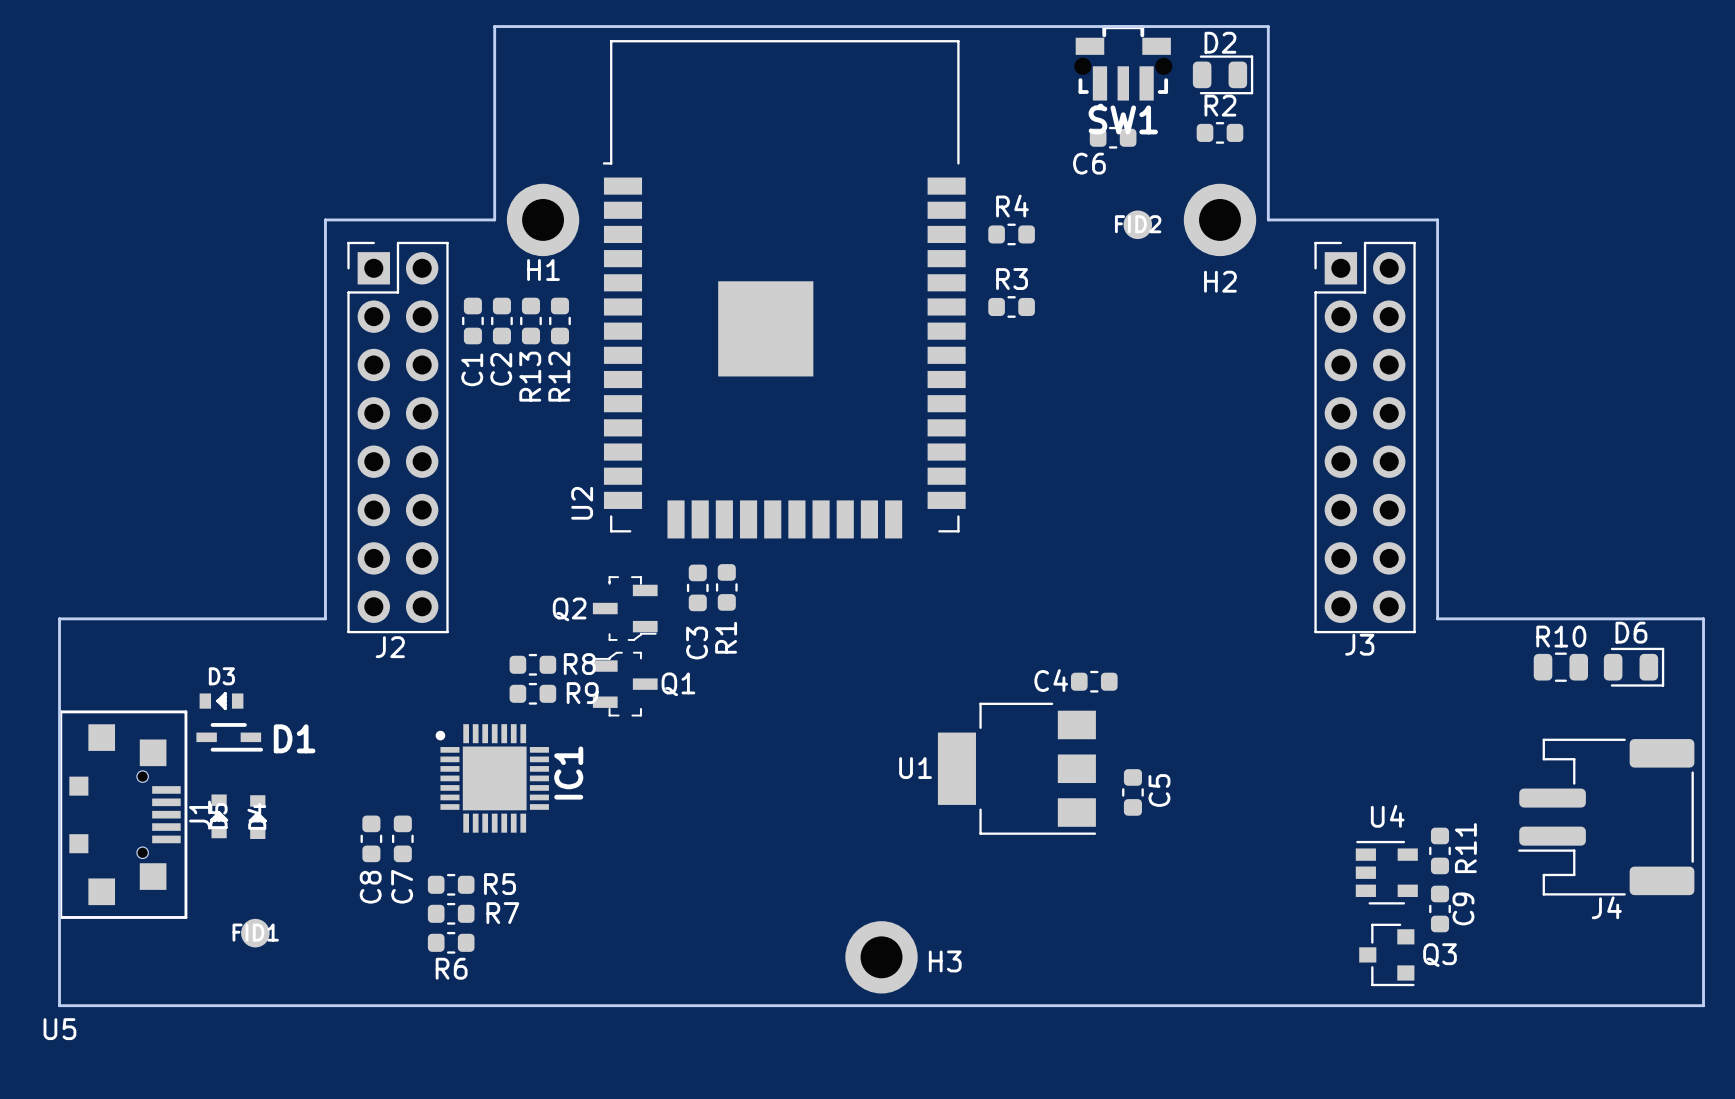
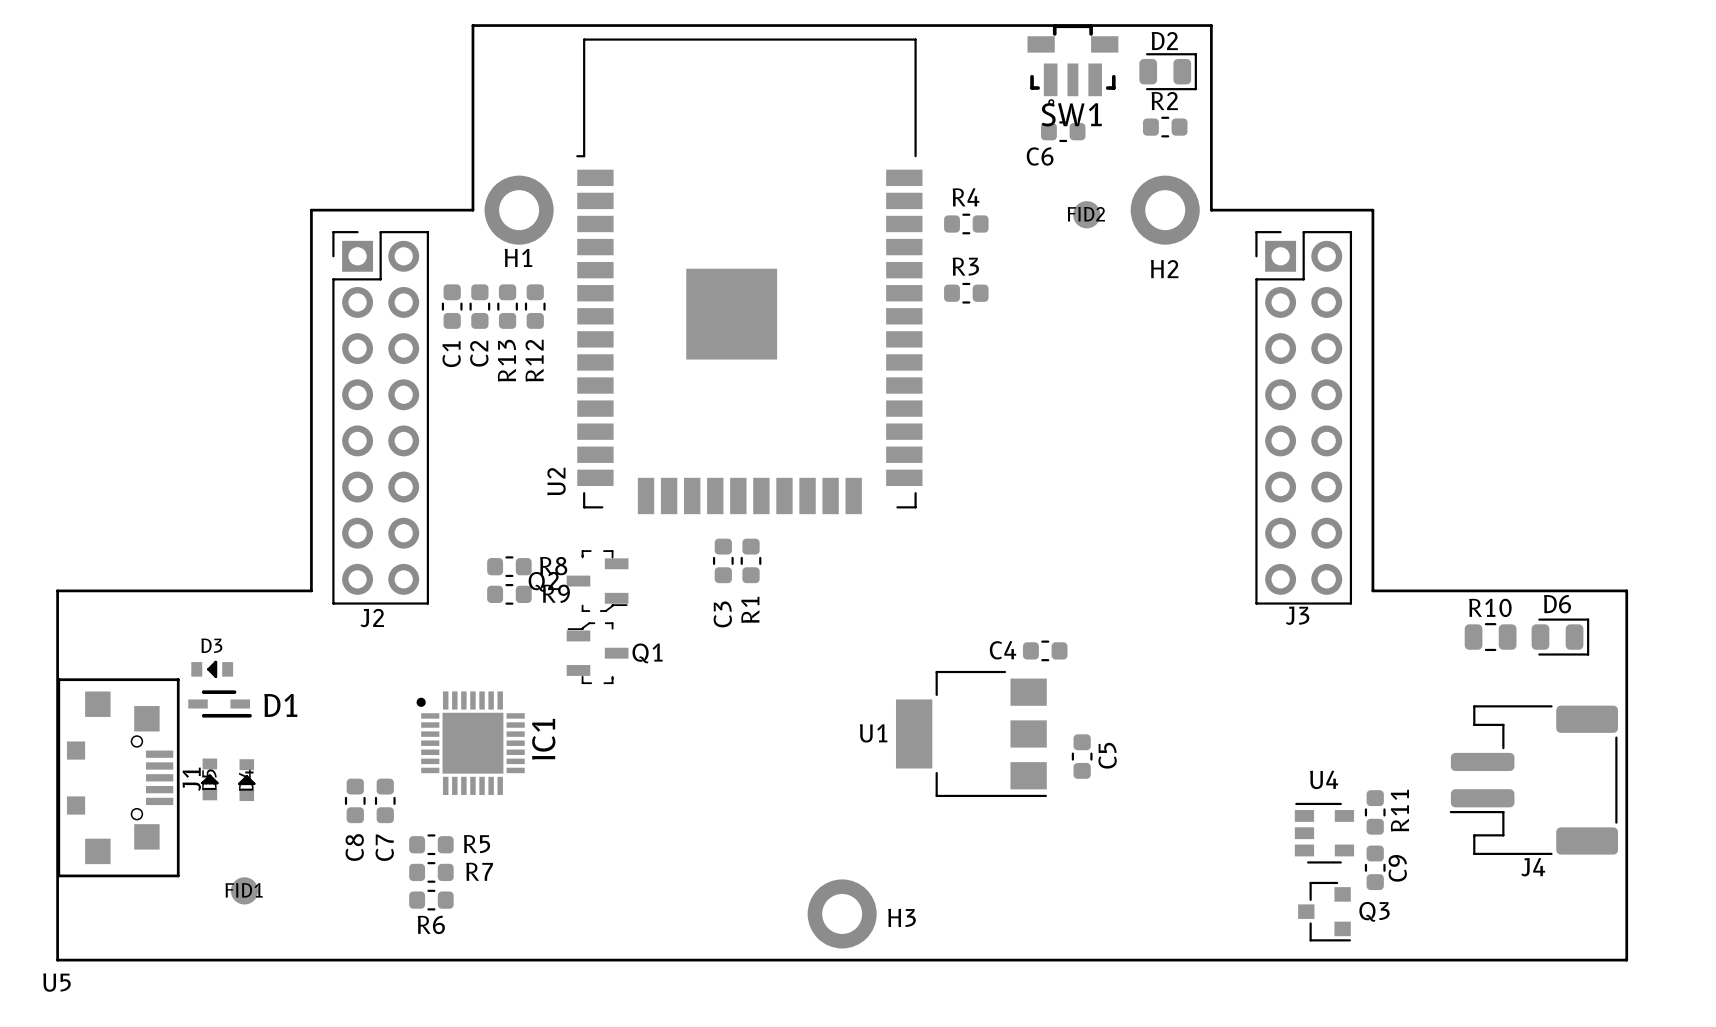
C3 position: (697, 587) -> (723, 560)
R1 position: (726, 587) -> (751, 560)
R8 position: (532, 664) -> (509, 566)
R9 position: (532, 693) -> (509, 594)

